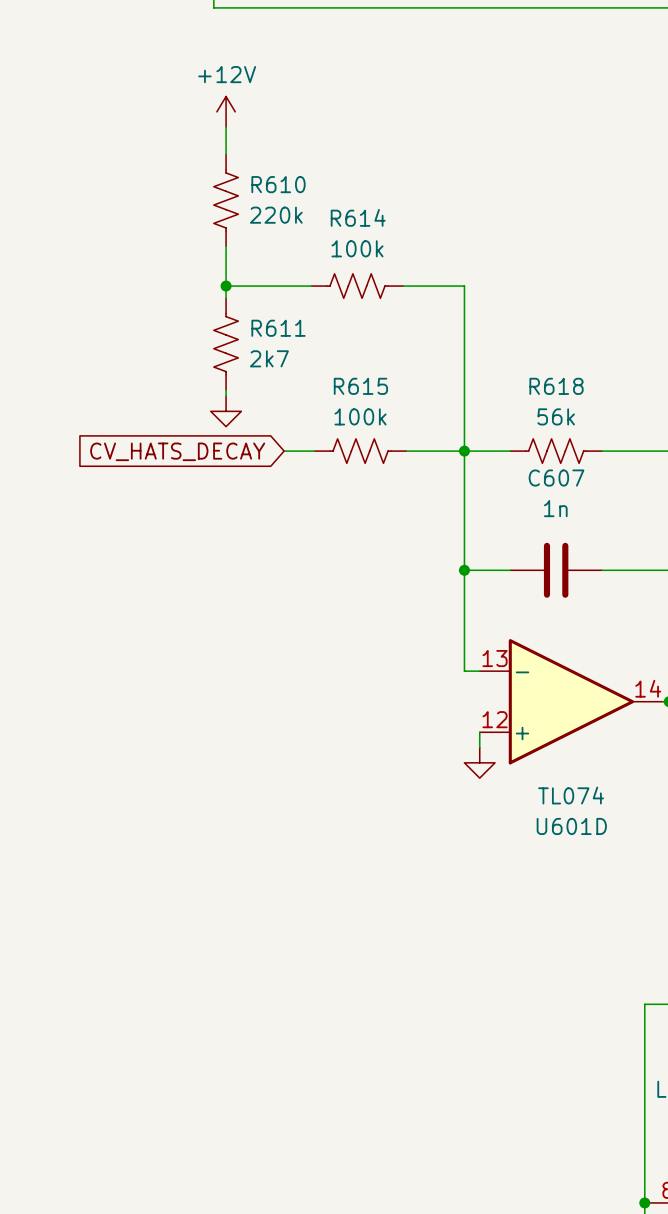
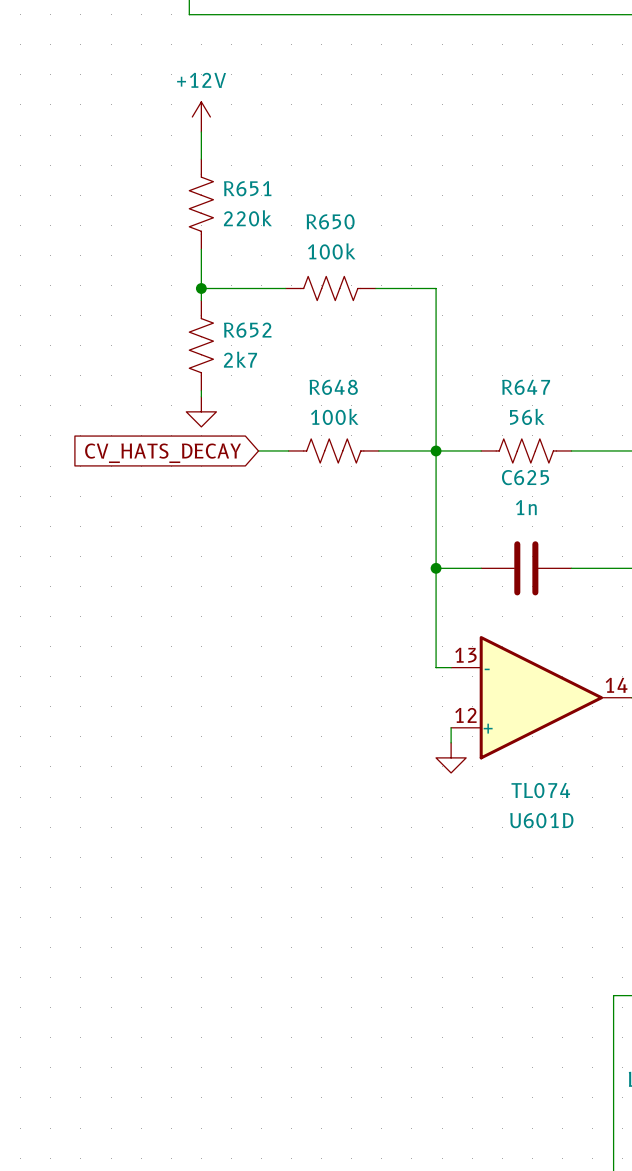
R610 name: R610 (278, 184) -> R651 (247, 188)
R614 name: R614 (358, 217) -> R650 (330, 221)
R611 name: R611 (278, 328) -> R652 (247, 330)
R615 name: R615 (360, 386) -> R648 (333, 387)
R618 name: R618 (556, 386) -> R647 (526, 387)
C607 name: C607 (556, 478) -> C625 (525, 477)

